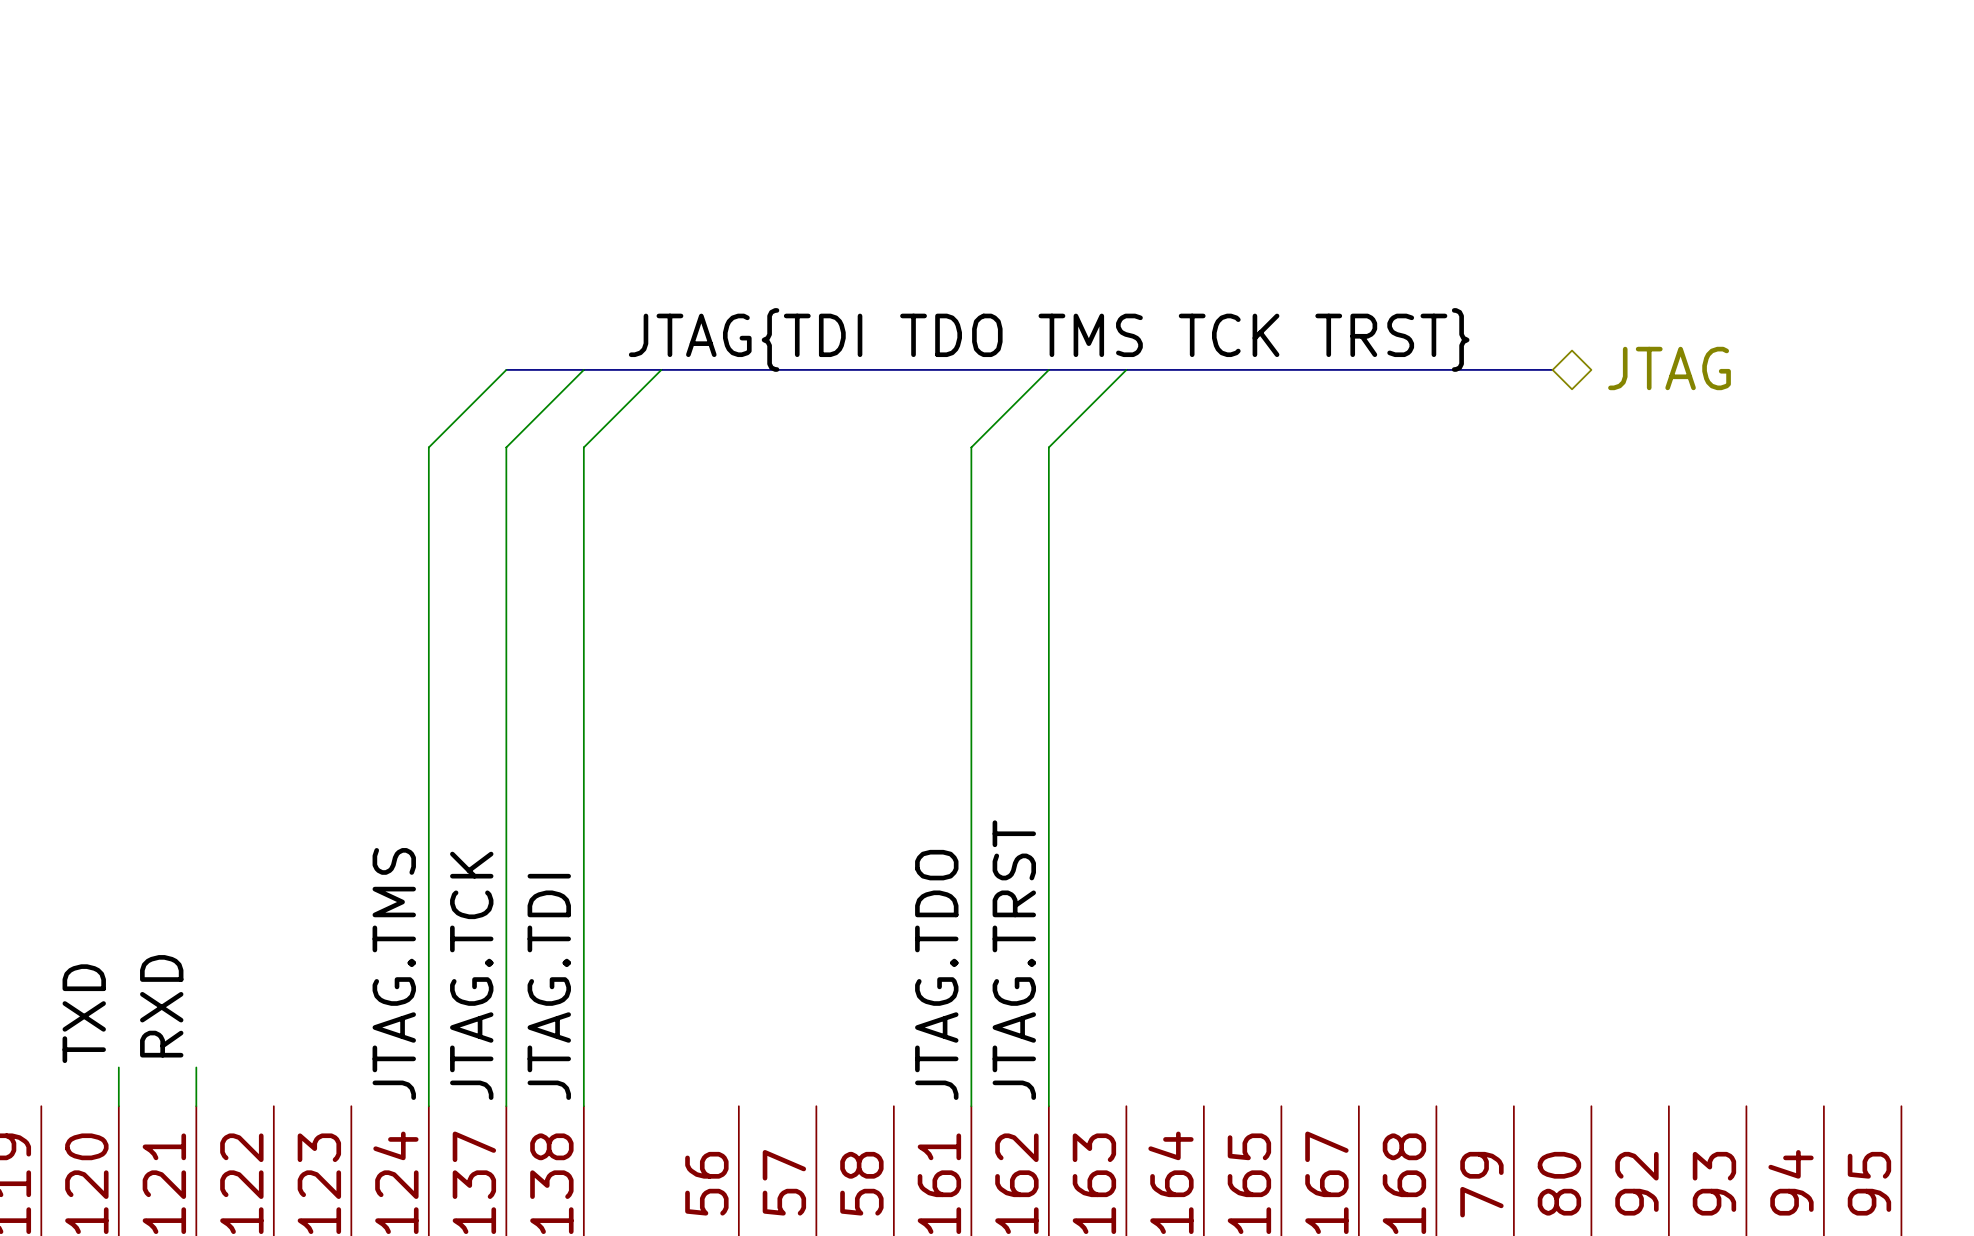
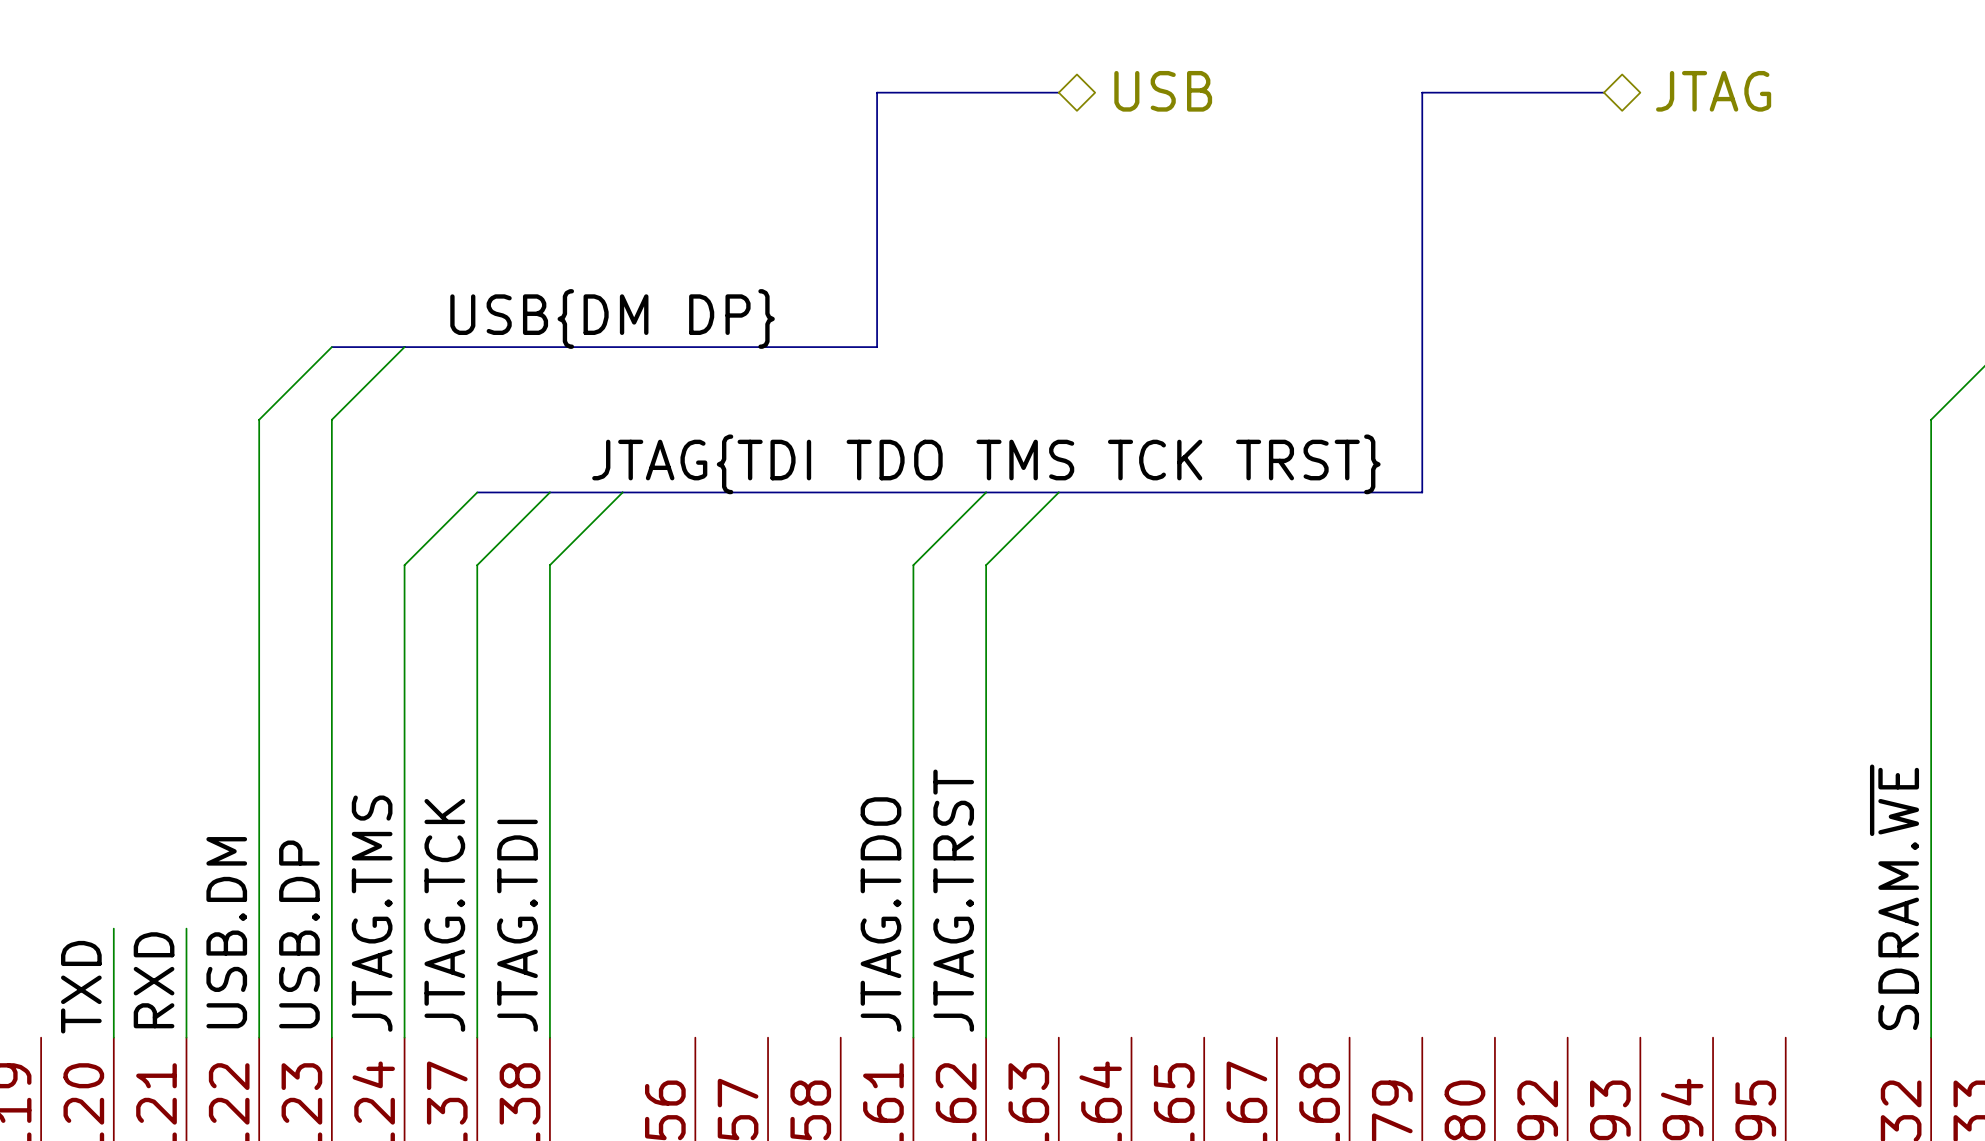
hierarchical label: none -> USB (1163, 91)
bus: none -> (1604, 92) (1422, 92) (1422, 492) (477, 492)
label: none -> USB{DM DP} (612, 318)
label position: JTAG{TDI TDO TMS TCK TRST} (1049, 339) -> JTAG{TDI TDO TMS TCK TRST} (986, 464)
hierarchical label position: JTAG (1669, 368) -> JTAG (1713, 91)
wire: none -> (331, 347) (259, 419) (259, 1037)
bus: none -> (331, 347) (477, 347)
wire: none -> (404, 347) (331, 419) (331, 1037)
wire: (506, 369) (428, 447) (428, 602) -> (477, 492) (404, 565)
wire: (583, 369) (506, 447) (506, 602) -> (549, 492) (477, 565)
wire: (661, 369) (583, 447) (583, 602) -> (622, 492) (549, 565)
bus: (932, 369) (1552, 369) -> (877, 347) (877, 92) (1058, 92)
wire: (1048, 369) (971, 447) (971, 602) -> (986, 492) (913, 565)
wire: (1126, 369) (1048, 447) (1048, 602) -> (1058, 492) (986, 565)
wire: none -> (113, 928) (113, 1001)
wire: none -> (186, 928) (186, 1001)
label: none -> USB.DM (226, 932)
label: none -> USB.DP (299, 934)
label position: RXD (161, 1006) -> RXD (154, 980)
label position: TXD (84, 1013) -> TXD (81, 987)

